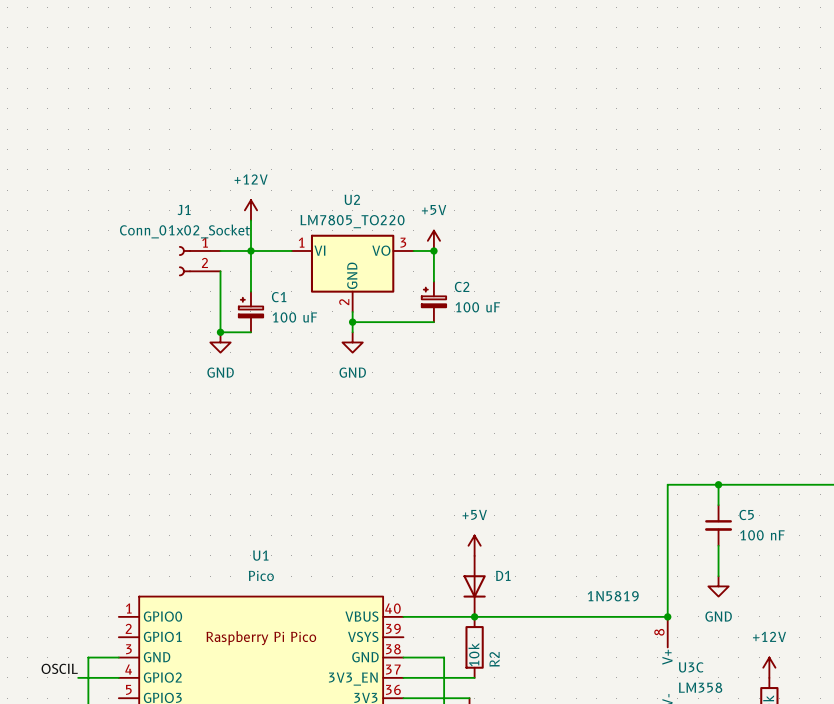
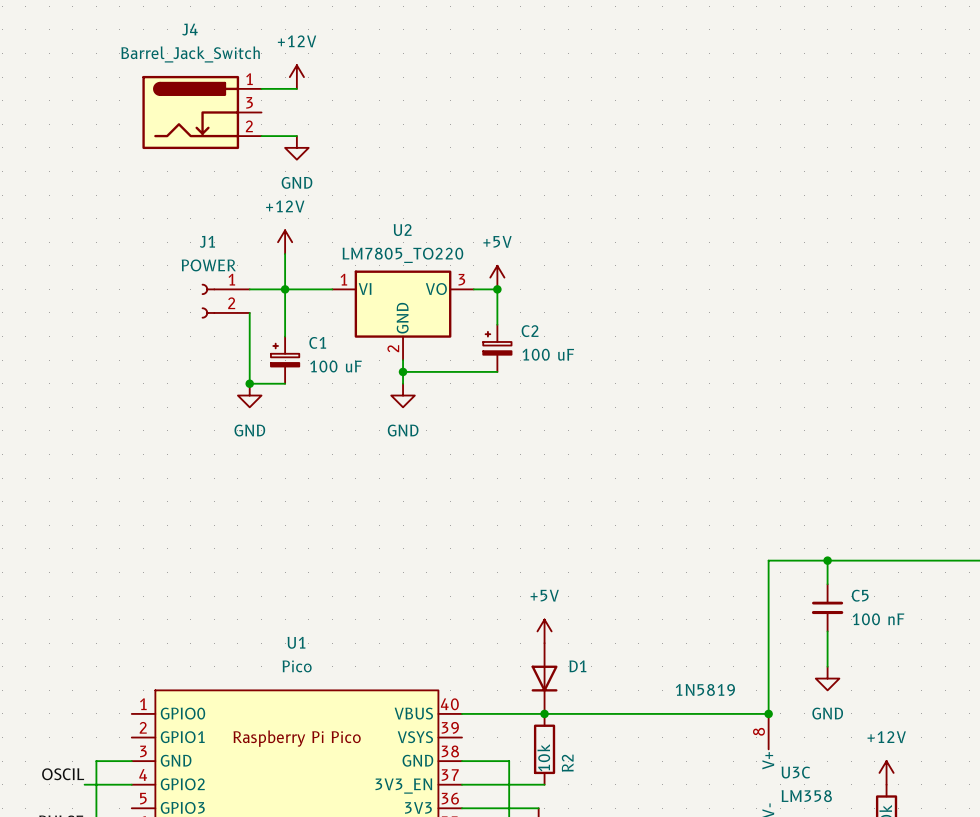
power symbol: none -> +12V (296, 77)
wire: none -> (261, 88) (296, 88)
J4: none -> Barrel_Jack_Switch (201, 112)
wire: none -> (261, 136) (296, 136)
power symbol: none -> GND (296, 147)
J1 value: Conn_01x02_Socket (184, 231) -> POWER (208, 265)

